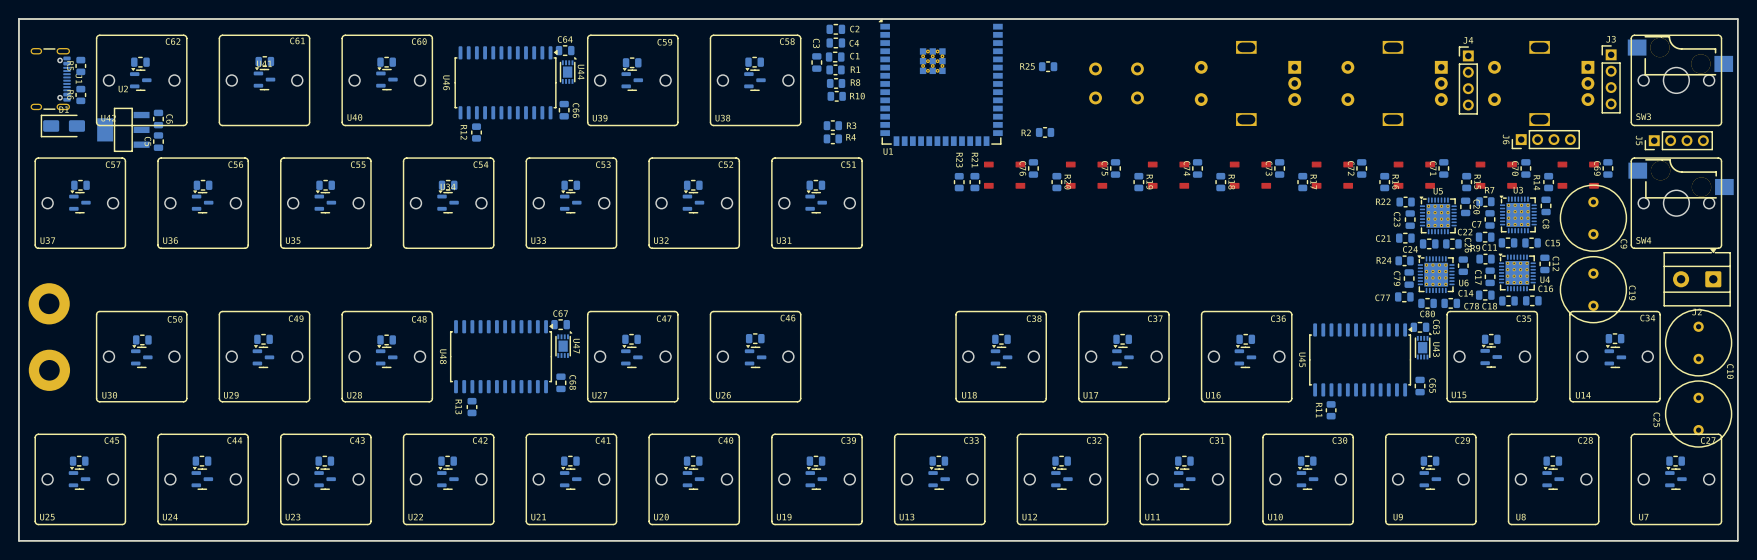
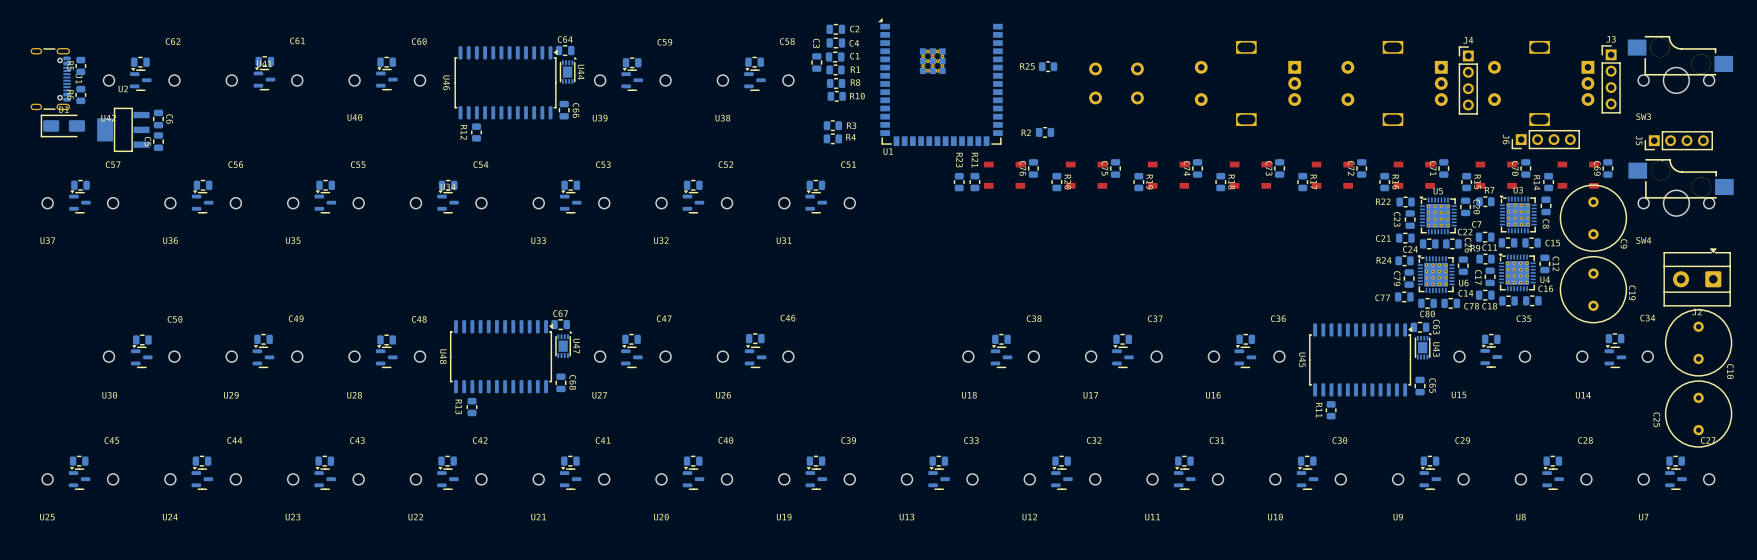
line: (1737, 19) (18, 19) (18, 540) (1737, 540) (1737, 19) -> none
board edge: (1737, 19) (18, 19) (18, 540) (1737, 540) (1737, 19) -> none
line: (183, 35) (97, 36) (97, 124) (185, 124) (186, 38) (183, 35) -> none
line: (306, 35) (220, 36) (220, 124) (308, 124) (309, 38) (306, 35) -> none
line: (429, 35) (343, 36) (343, 124) (431, 124) (432, 38) (429, 35) -> none
line: (674, 35) (588, 36) (588, 124) (676, 124) (677, 38) (674, 35) -> none
line: (797, 35) (711, 36) (711, 124) (799, 124) (800, 38) (797, 35) -> none
line: (1718, 35) (1632, 36) (1632, 124) (1720, 124) (1721, 38) (1718, 35) -> none
line: (122, 158) (36, 158) (36, 247) (124, 247) (125, 161) (122, 158) -> none
line: (244, 158) (158, 158) (158, 247) (247, 247) (248, 161) (244, 158) -> none
line: (367, 158) (281, 158) (281, 247) (370, 247) (370, 161) (367, 158) -> none
line: (490, 158) (404, 158) (404, 247) (492, 247) (493, 161) (490, 158) -> none
line: (613, 158) (527, 158) (527, 247) (615, 247) (616, 161) (613, 158) -> none
line: (736, 158) (650, 158) (650, 247) (738, 247) (739, 161) (736, 158) -> none
line: (858, 158) (772, 158) (772, 247) (861, 247) (862, 161) (858, 158) -> none
line: (1718, 158) (1632, 158) (1632, 247) (1720, 247) (1721, 161) (1718, 158) -> none
part: (1489, 219) -> none
part: (49, 303) -> none
line: (183, 311) (97, 312) (97, 400) (185, 400) (186, 314) (183, 311) -> none
line: (306, 311) (220, 312) (220, 400) (308, 400) (309, 314) (306, 311) -> none
line: (429, 311) (343, 312) (343, 400) (431, 400) (432, 314) (429, 311) -> none
line: (674, 311) (588, 312) (588, 400) (676, 400) (677, 314) (674, 311) -> none
line: (797, 311) (711, 312) (711, 400) (799, 400) (800, 314) (797, 311) -> none
line: (1043, 311) (956, 312) (956, 400) (1045, 400) (1046, 314) (1043, 311) -> none
line: (1165, 311) (1079, 312) (1079, 400) (1168, 400) (1169, 314) (1165, 311) -> none
line: (1288, 311) (1202, 312) (1202, 400) (1290, 400) (1291, 314) (1288, 311) -> none
line: (1534, 311) (1448, 312) (1448, 400) (1536, 400) (1537, 314) (1534, 311) -> none
line: (1656, 311) (1570, 312) (1570, 400) (1659, 400) (1660, 314) (1656, 311) -> none
part: (49, 370) -> none
line: (122, 434) (36, 435) (36, 523) (124, 523) (125, 437) (122, 434) -> none
line: (244, 434) (158, 435) (158, 523) (247, 523) (248, 437) (244, 434) -> none
line: (367, 434) (281, 435) (281, 523) (370, 523) (370, 437) (367, 434) -> none
line: (490, 434) (404, 435) (404, 523) (492, 523) (493, 437) (490, 434) -> none
line: (613, 434) (527, 435) (527, 523) (615, 523) (616, 437) (613, 434) -> none
line: (736, 434) (650, 435) (650, 523) (738, 523) (739, 437) (736, 434) -> none
line: (858, 434) (772, 435) (772, 523) (861, 523) (862, 437) (858, 434) -> none
line: (981, 434) (895, 435) (895, 523) (983, 523) (984, 437) (981, 434) -> none
line: (1104, 434) (1018, 435) (1018, 523) (1106, 523) (1107, 437) (1104, 434) -> none
line: (1227, 434) (1141, 435) (1141, 523) (1229, 523) (1230, 437) (1227, 434) -> none
line: (1349, 434) (1263, 435) (1263, 523) (1352, 523) (1353, 437) (1349, 434) -> none
line: (1472, 434) (1386, 435) (1386, 523) (1475, 523) (1475, 437) (1472, 434) -> none
line: (1595, 434) (1509, 435) (1509, 523) (1597, 523) (1598, 437) (1595, 434) -> none
line: (1718, 434) (1632, 435) (1632, 523) (1720, 523) (1721, 437) (1718, 434) -> none

